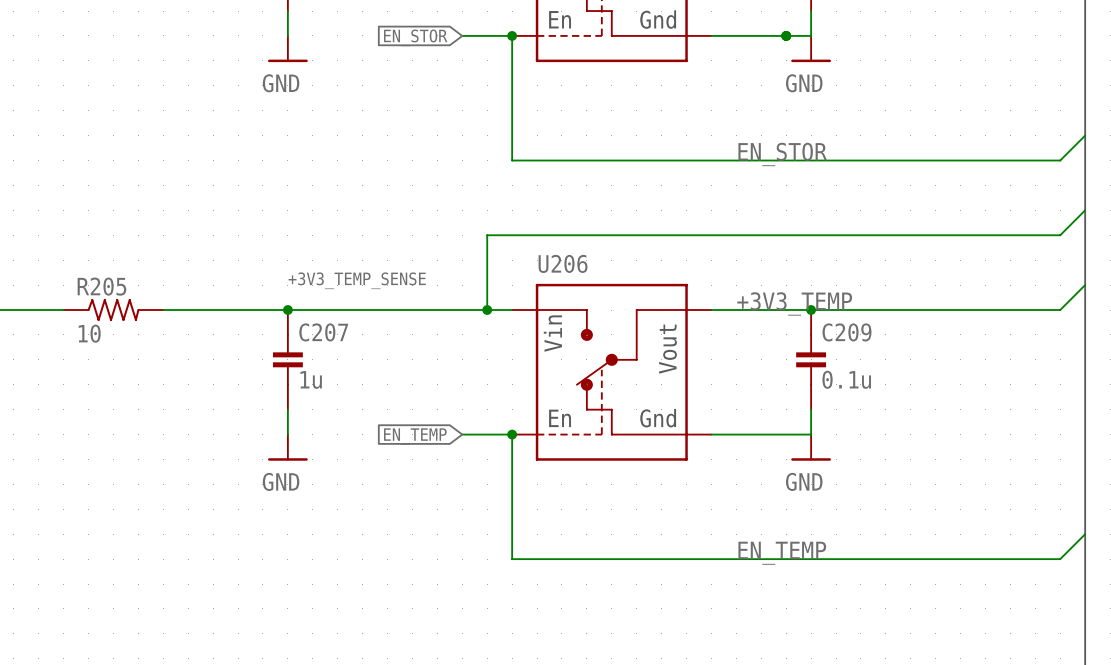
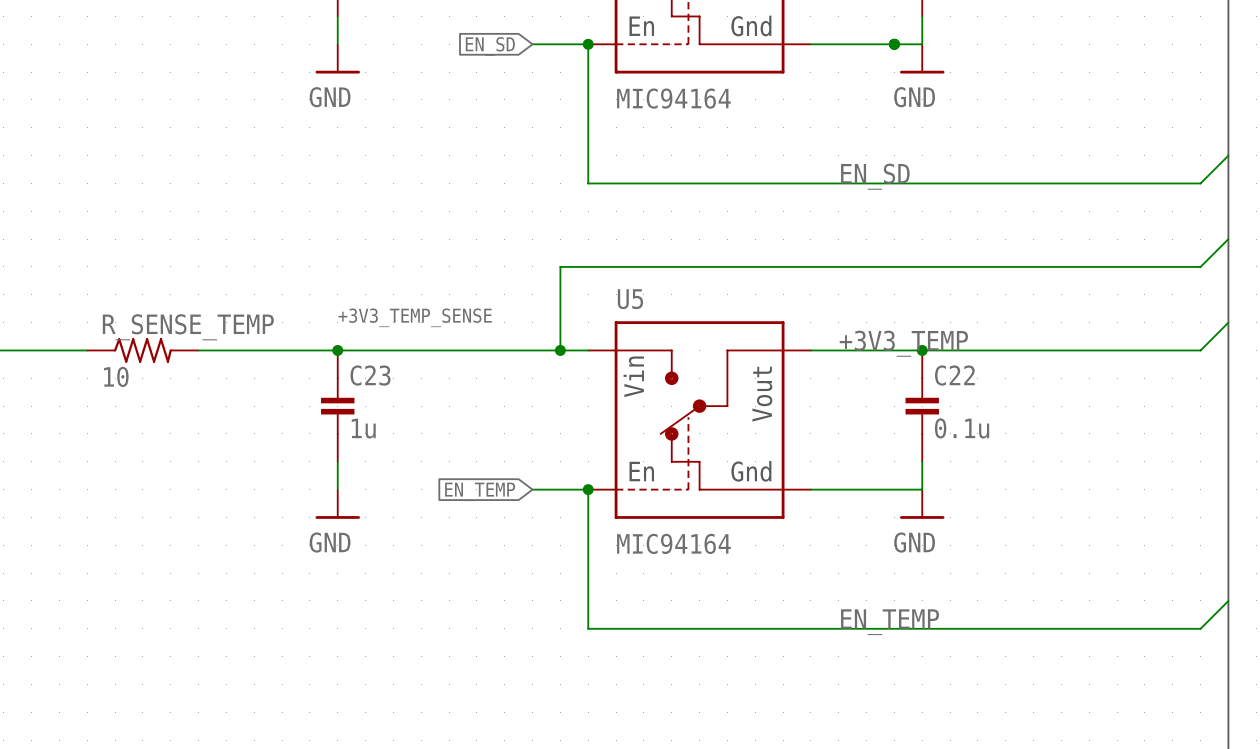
global label: EN_STOR (415, 37) -> EN_SD (490, 46)
part text: none -> MIC94164 (673, 98)
label: EN_STOR (782, 154) -> EN_SD (875, 176)
U206 name: U206 (563, 263) -> U5 (630, 299)
R205 name: R205 (101, 286) -> R_SENSE_TEMP (188, 327)
C207 name: C207 (323, 332) -> C23 (370, 375)
C209 name: C209 (846, 332) -> C22 (954, 375)
U206 text: none -> MIC94164 (673, 543)

